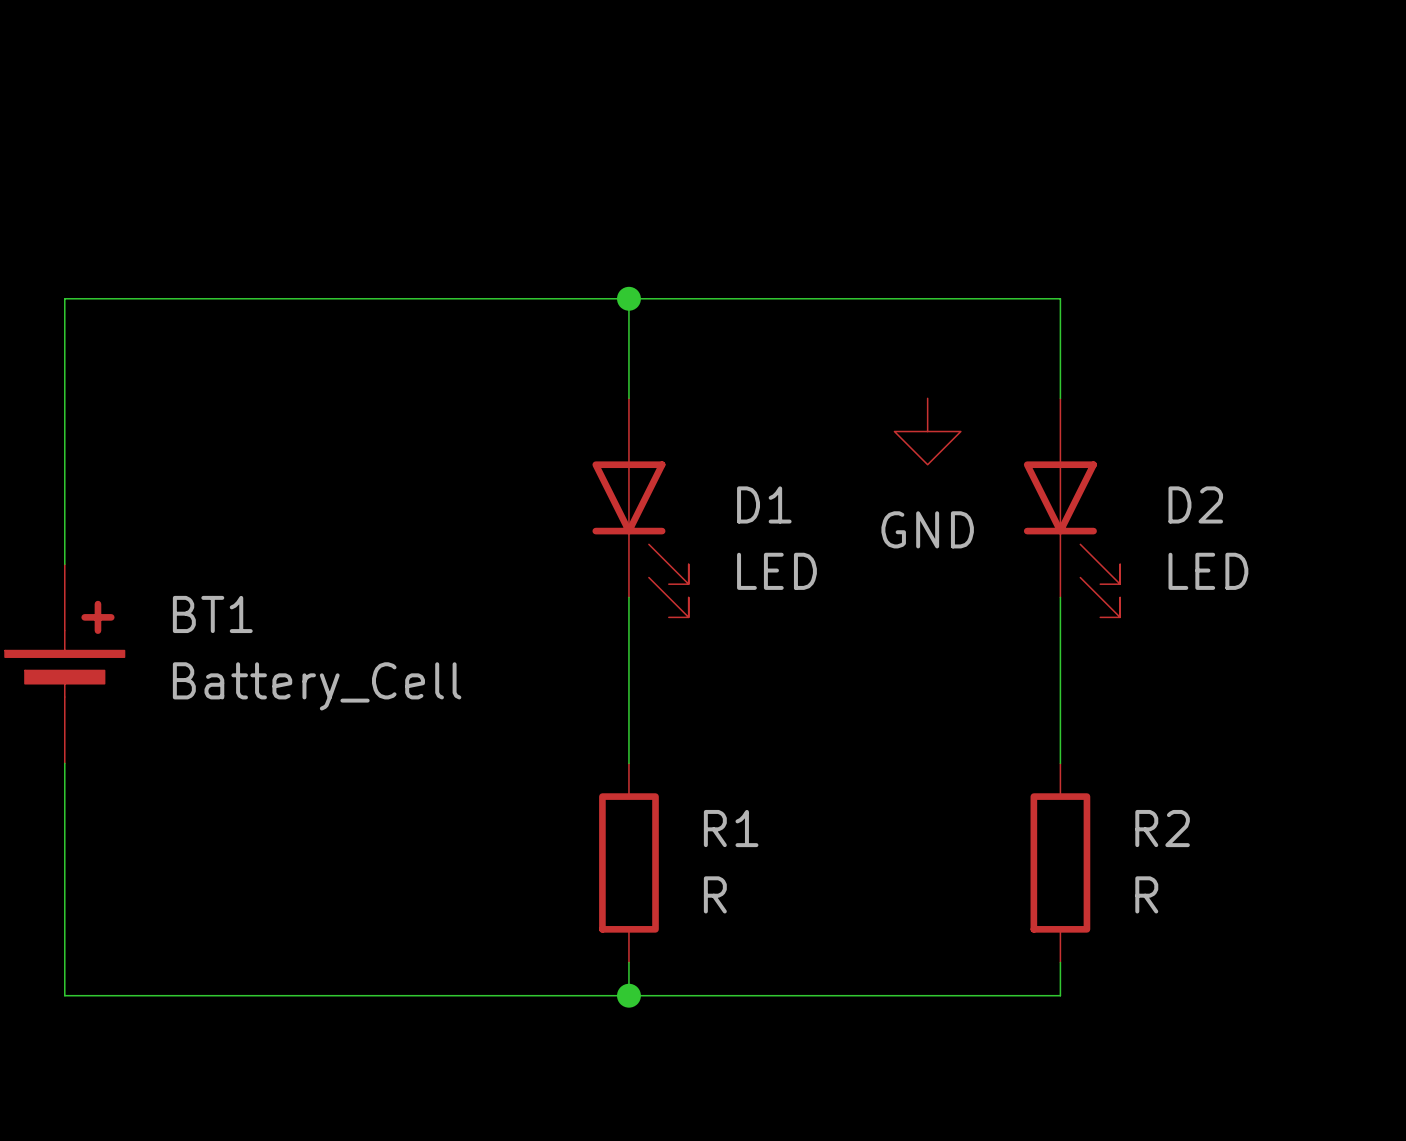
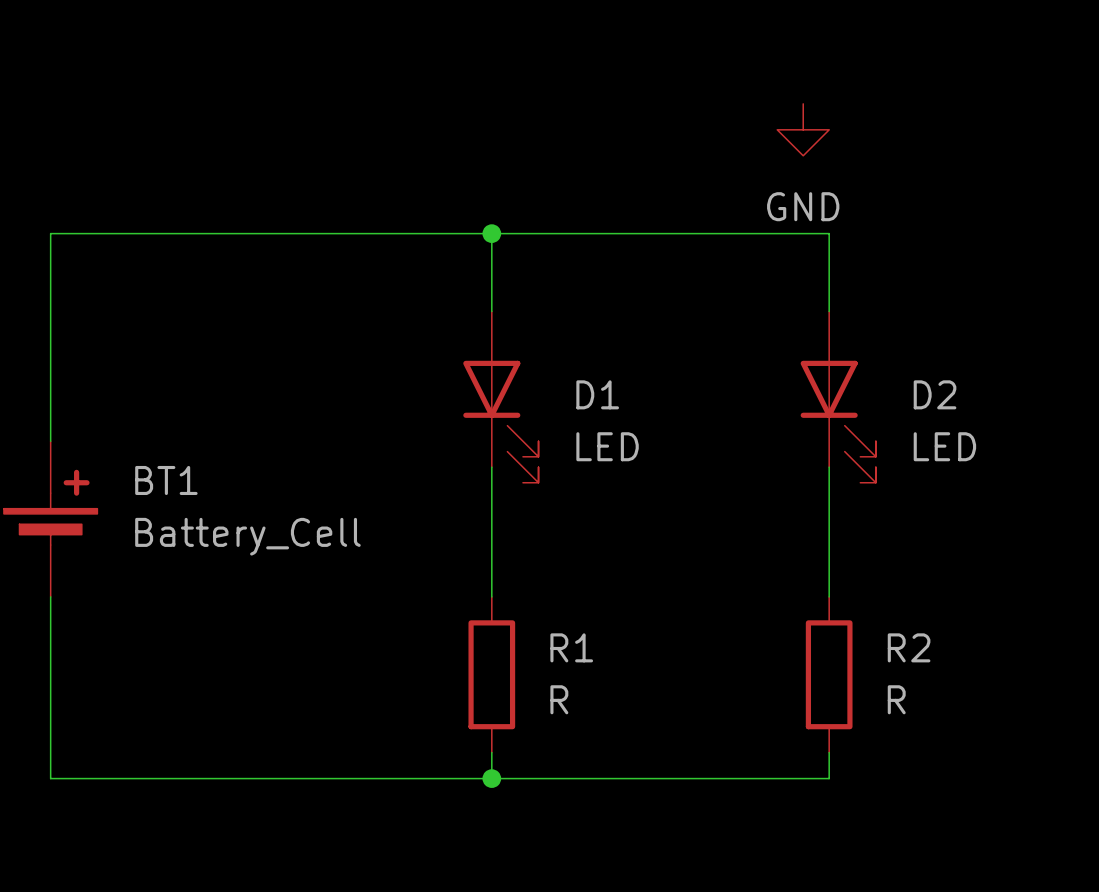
power symbol position: GND (927, 431) -> GND (803, 129)

